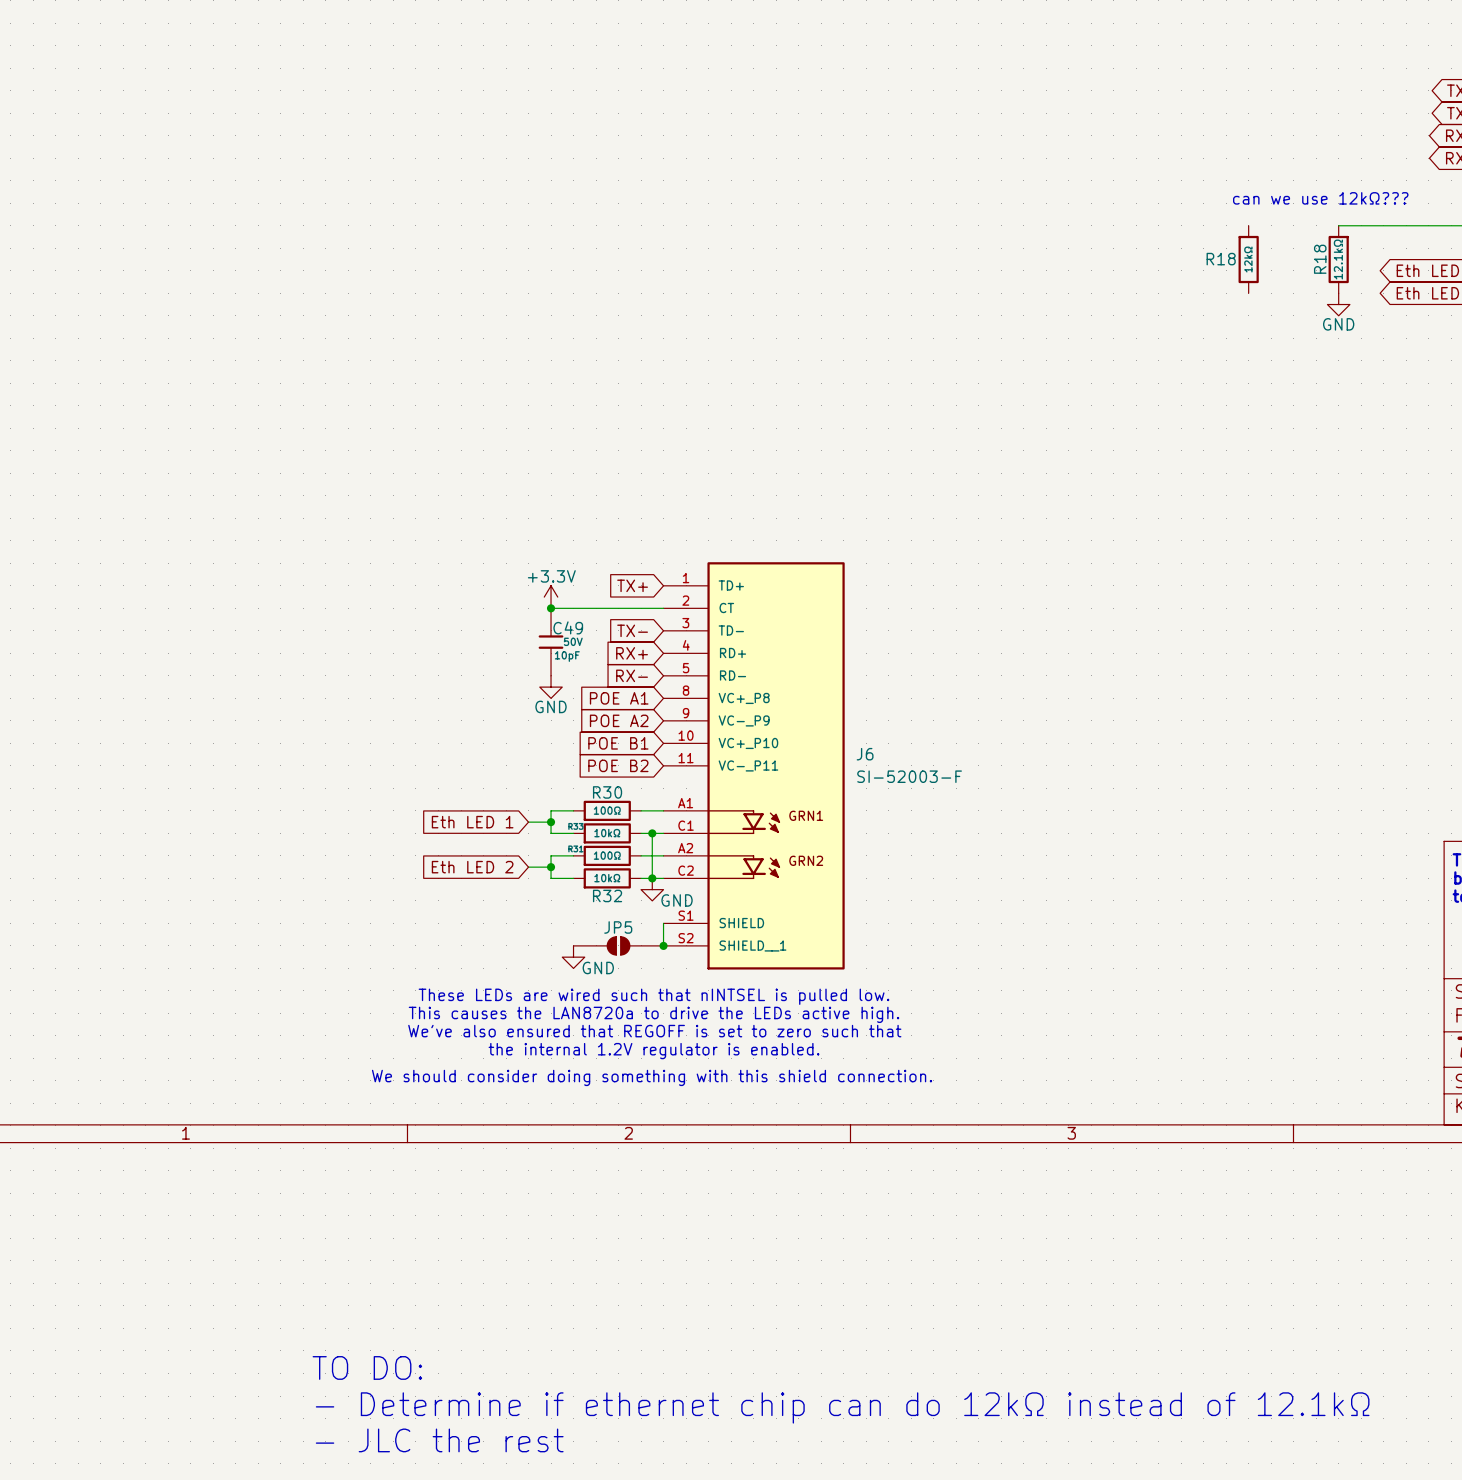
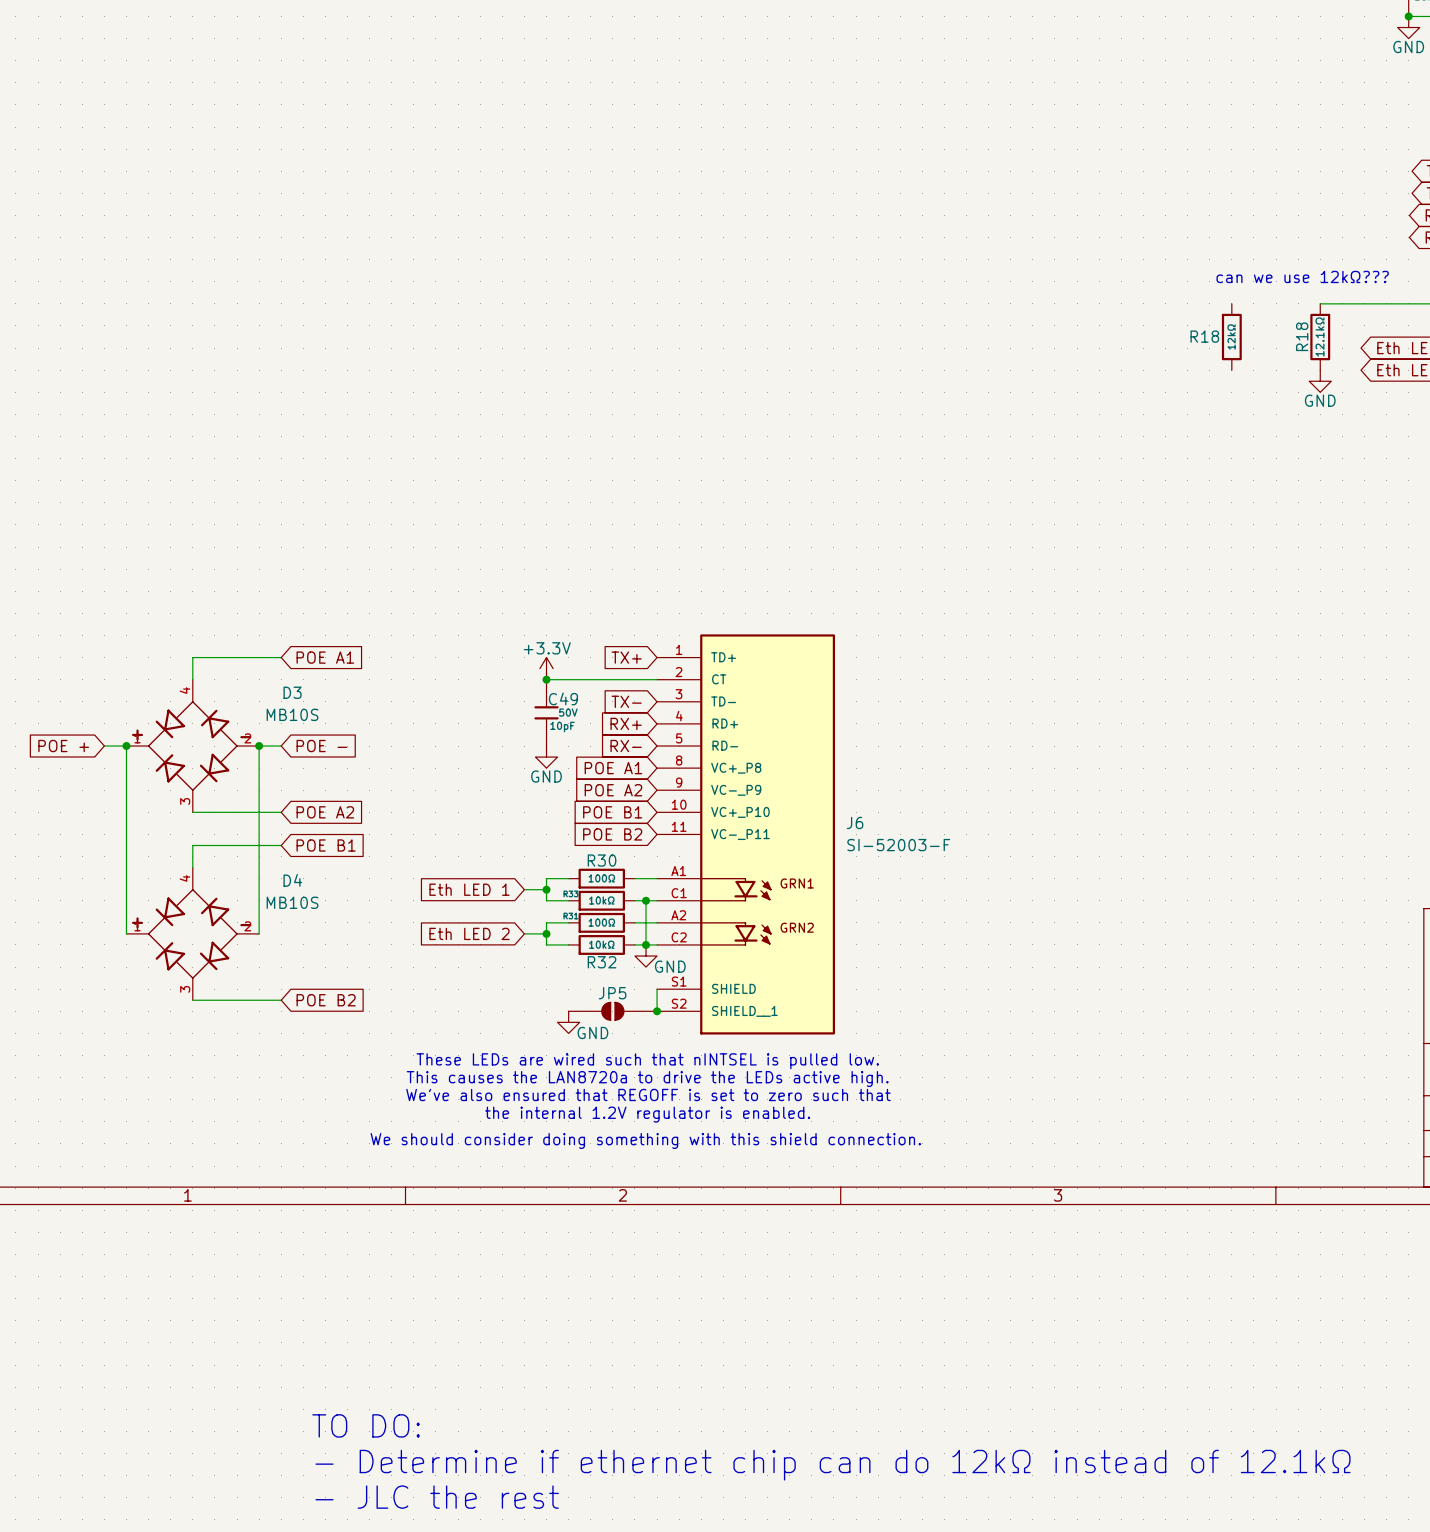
wire: none -> (281, 657) (192, 657) (192, 679)
global label: none -> POE A1 (325, 657)
global label: none -> POE + (63, 746)
wire: none -> (104, 746) (126, 746) (126, 933)
junction: none -> (126, 746)
D3: none -> MB10S (192, 746)
junction: none -> (259, 746)
wire: none -> (281, 746) (259, 746) (259, 933)
global label: none -> POE - (321, 746)
wire: none -> (192, 812) (281, 812)
global label: none -> POE A2 (325, 812)
wire: none -> (281, 845) (192, 845) (192, 867)
global label: none -> POE B1 (326, 845)
D4: none -> MB10S (192, 933)
wire: none -> (192, 1000) (281, 1000)
global label: none -> POE B2 (326, 1000)

